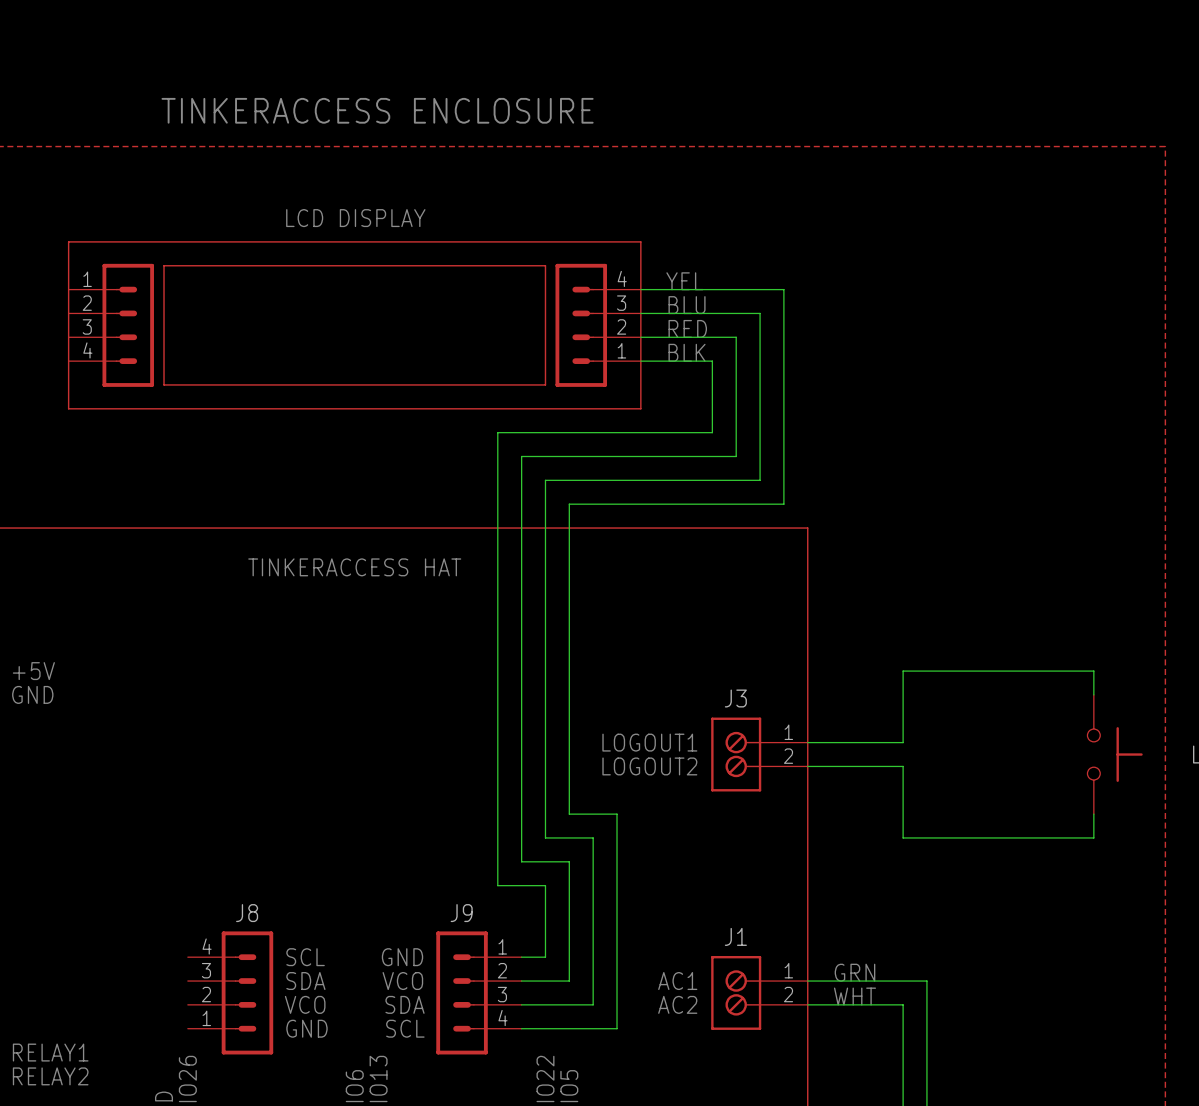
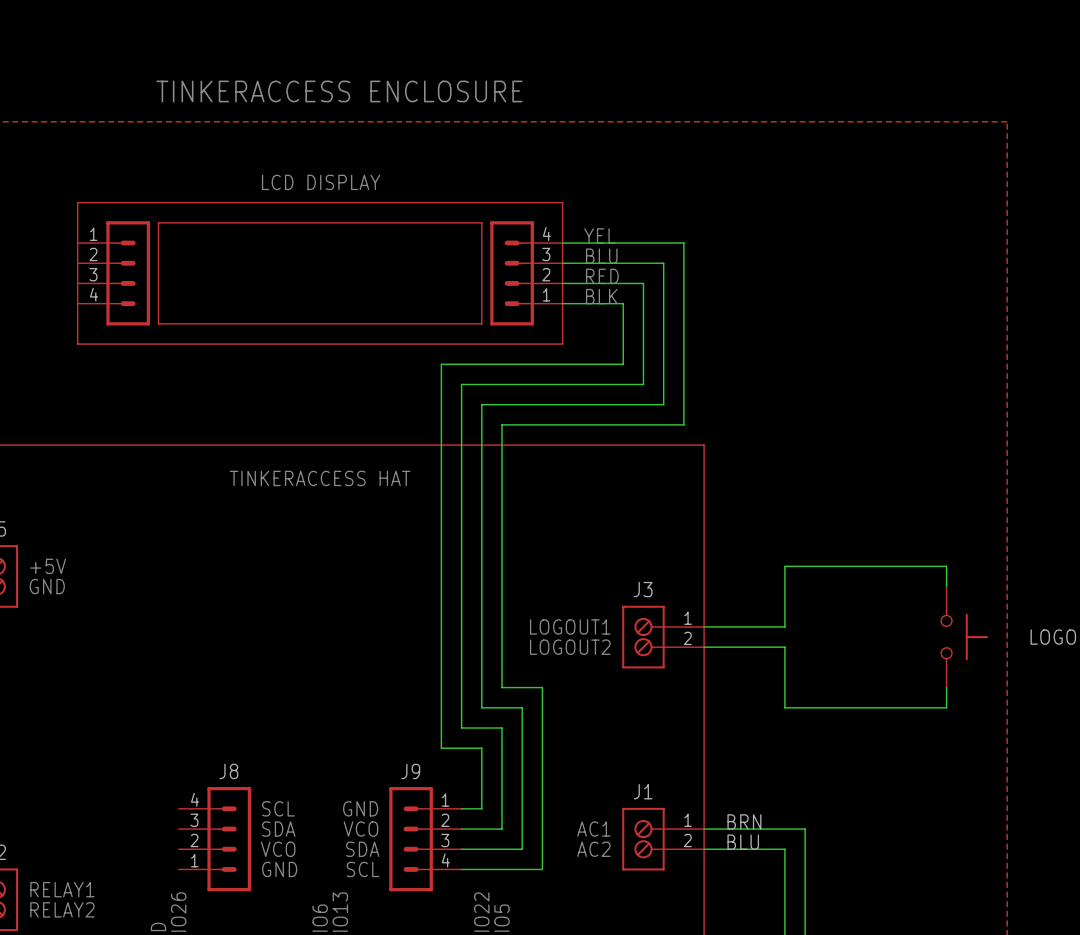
text: GRN (854, 972) -> none
label: none -> BRN (744, 821)
label: none -> BLU (743, 842)
text: WHT (854, 996) -> none

